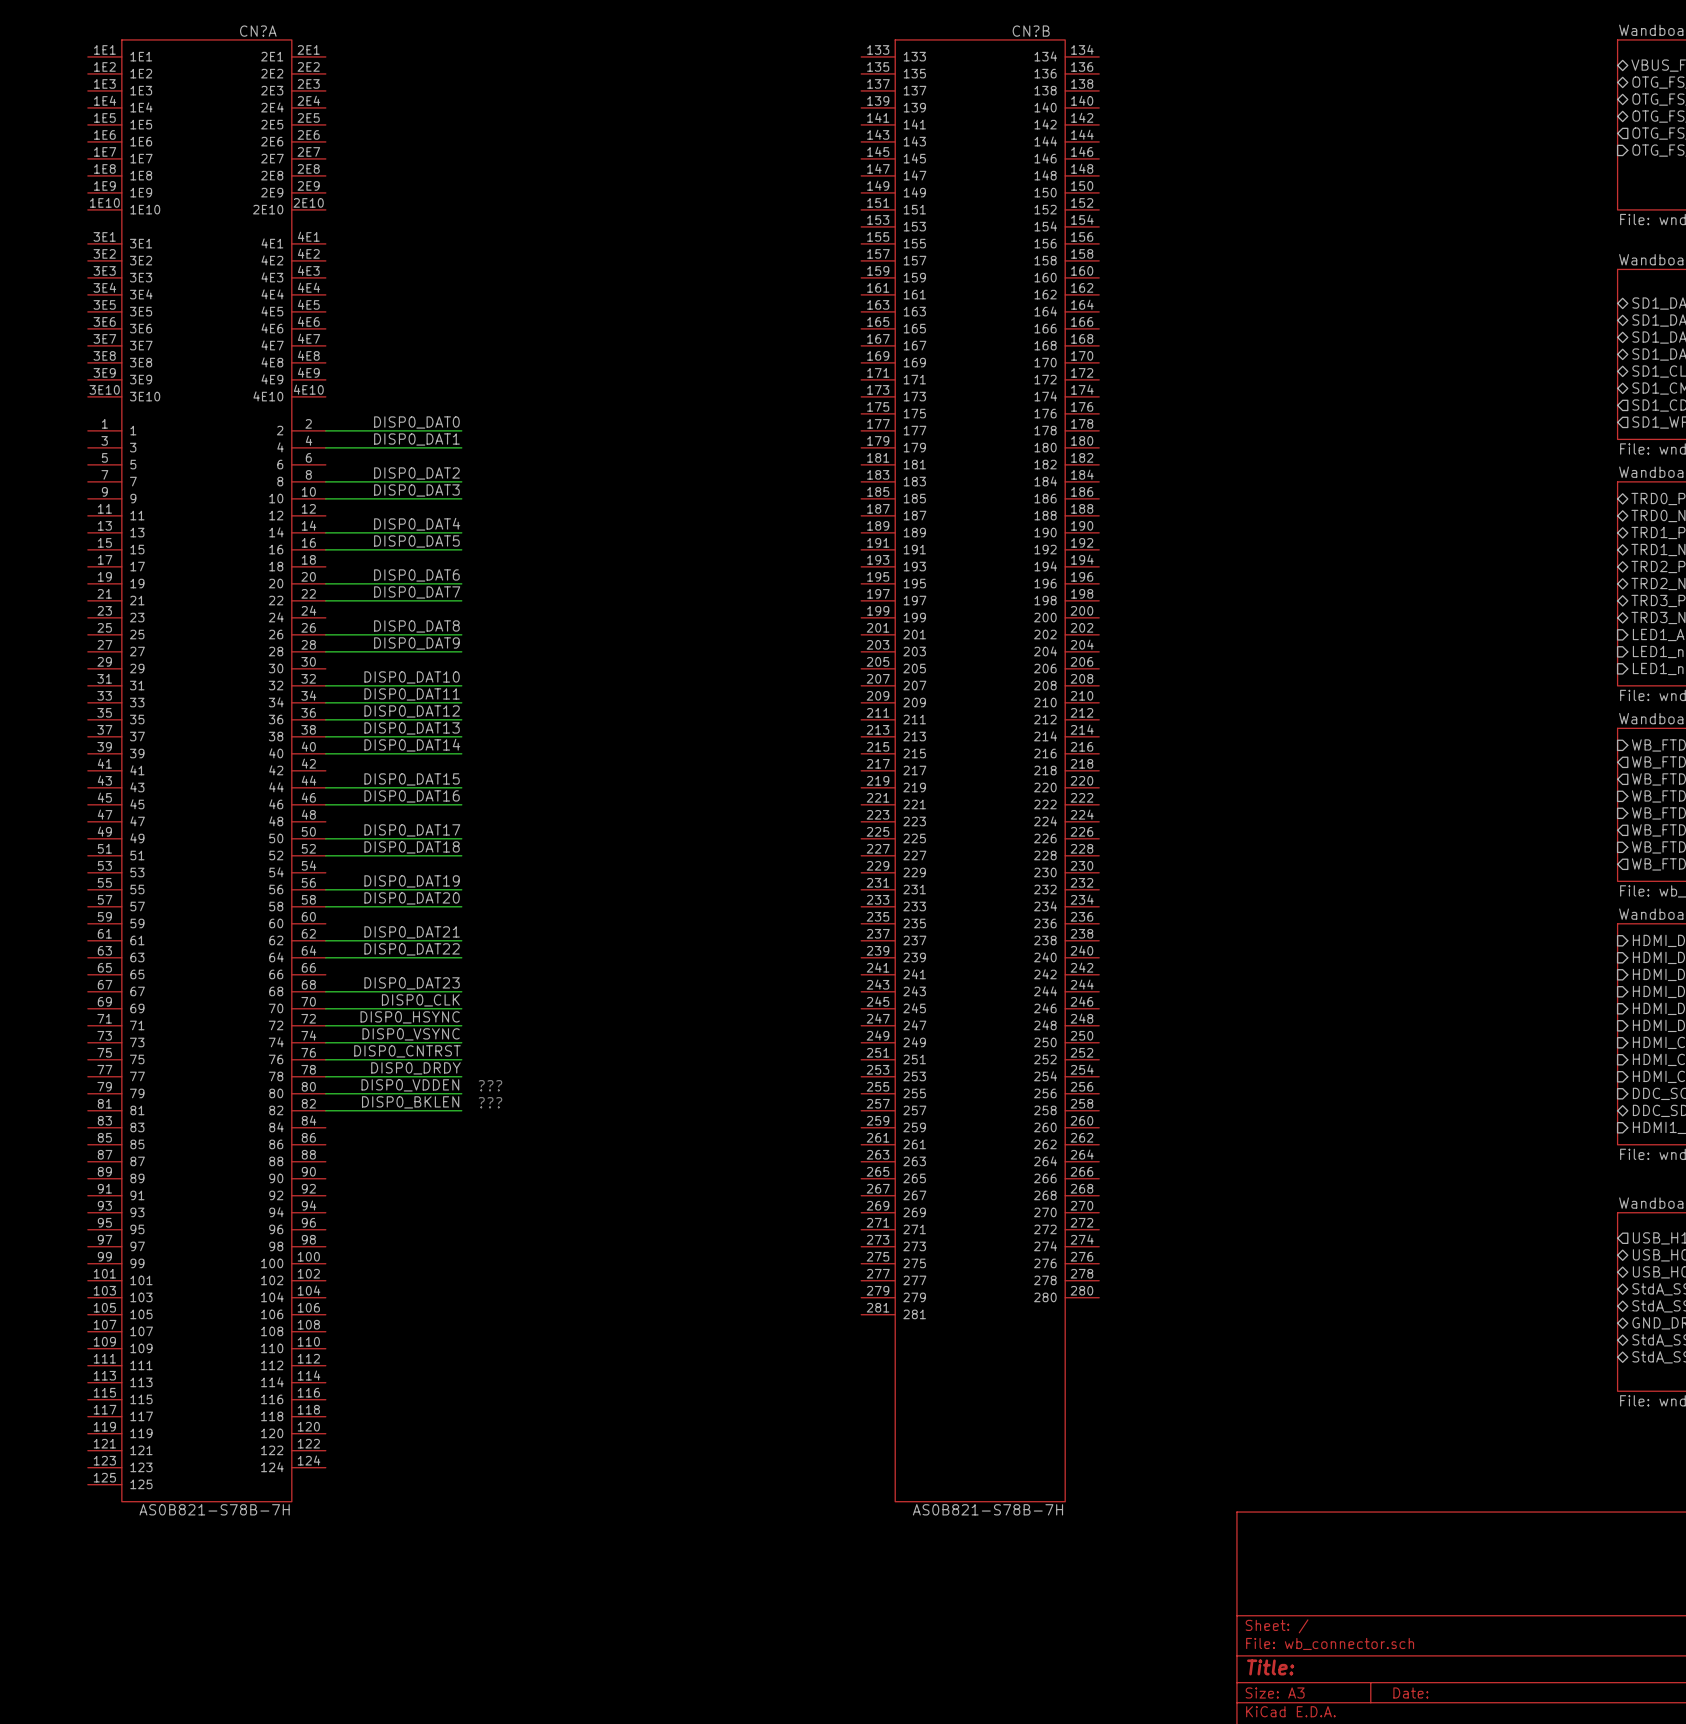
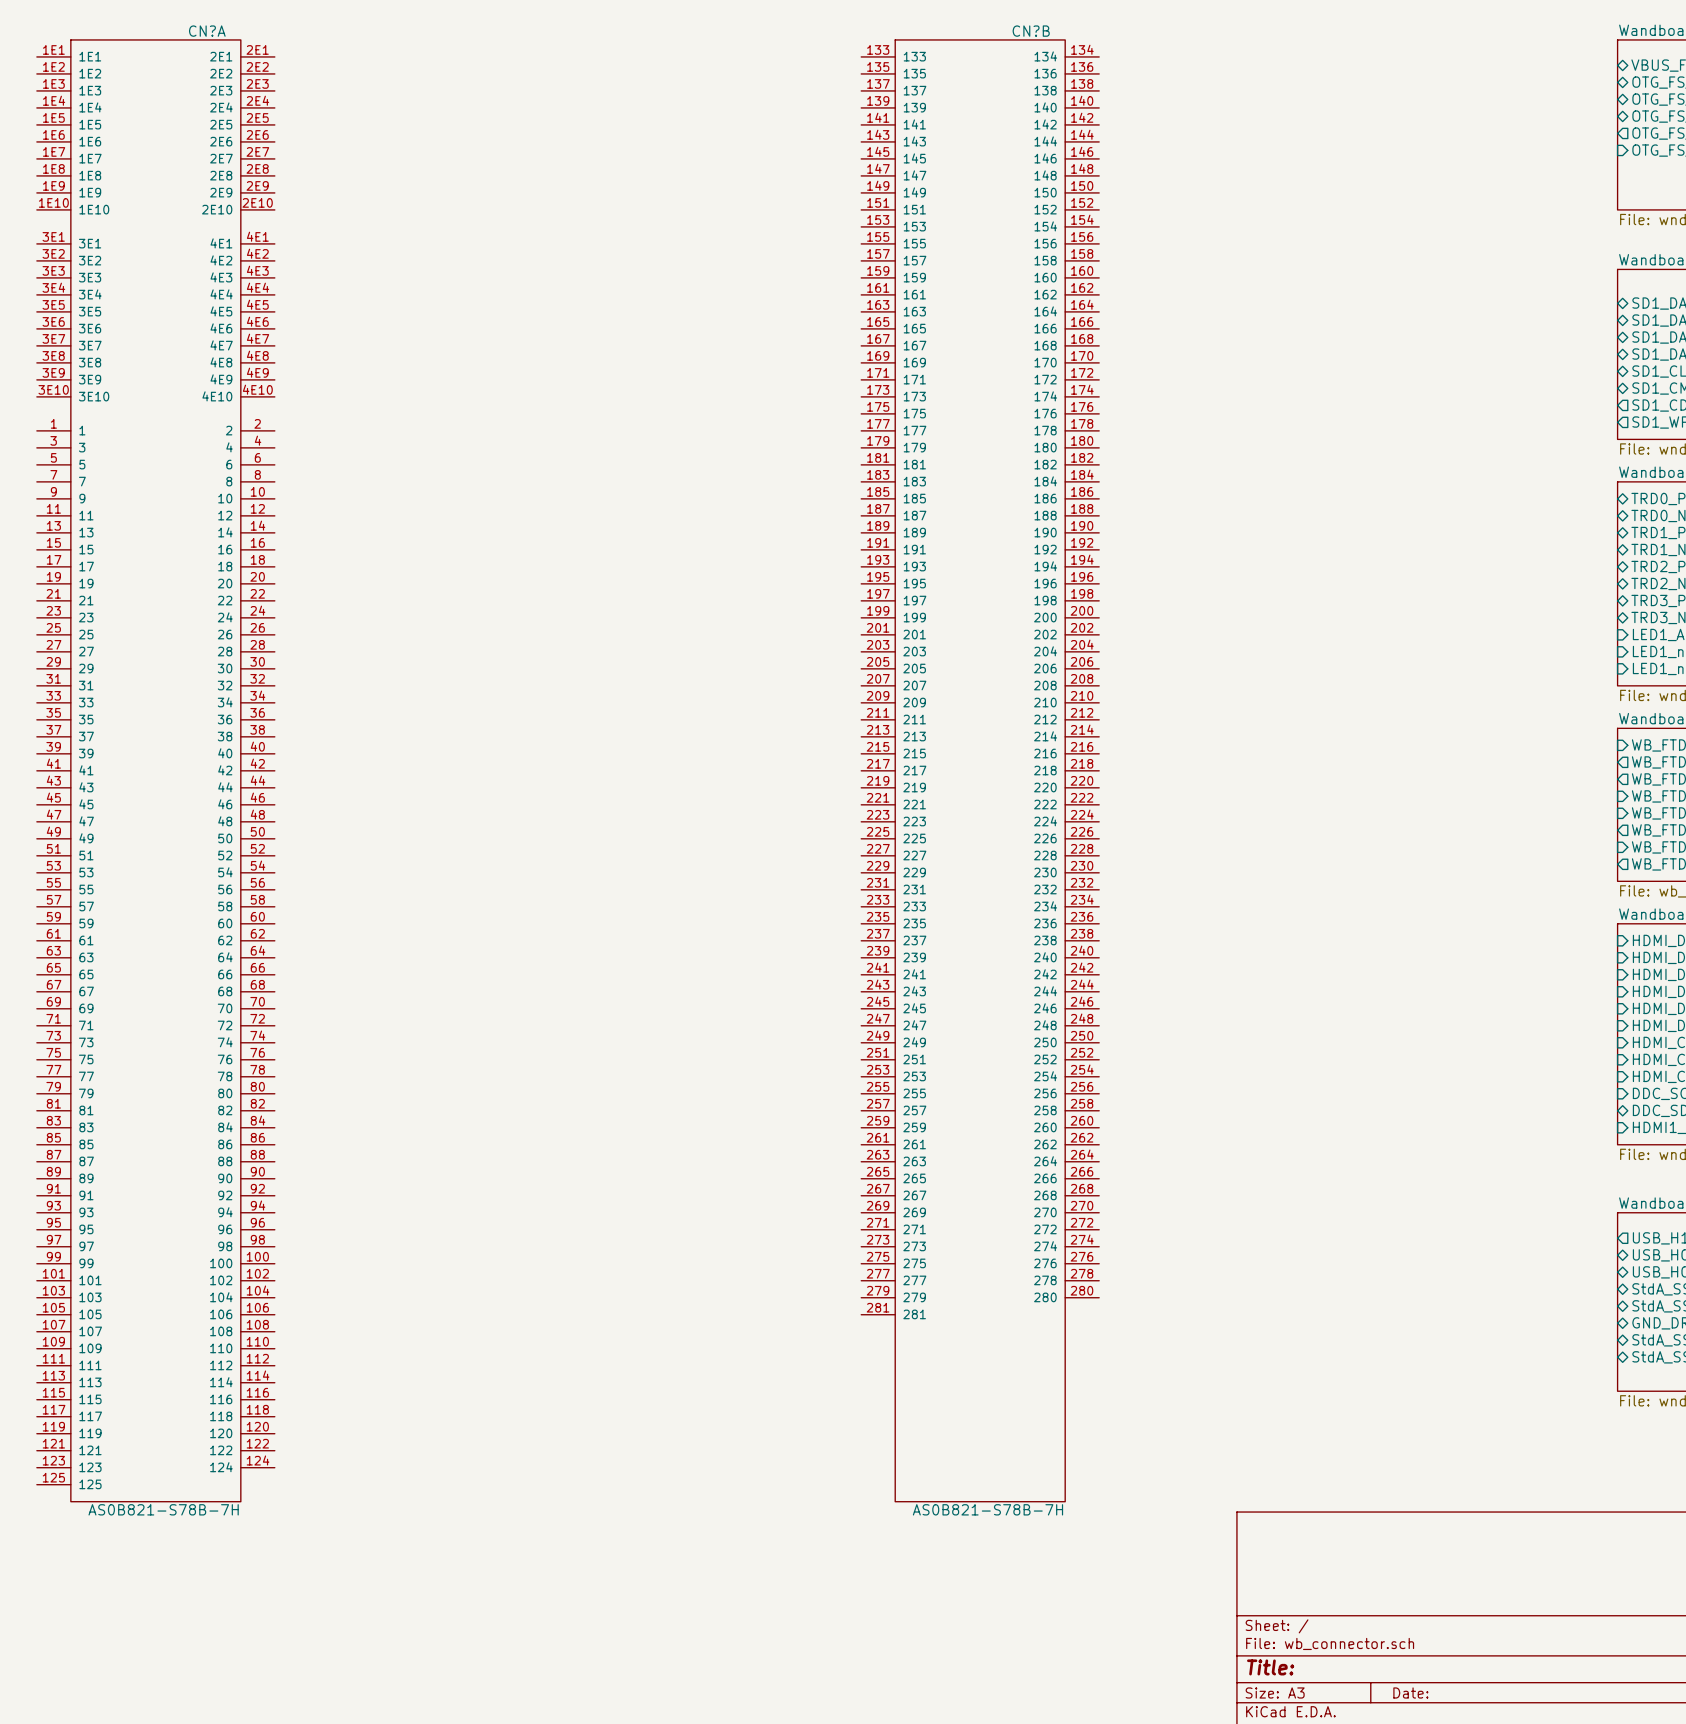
label: DISP0_DAT0 (416, 422) -> none
wire: (325, 430) (461, 430) -> none
label: DISP0_DAT1 (416, 439) -> none
wire: (325, 447) (461, 447) -> none
label: DISP0_DAT2 (416, 473) -> none
wire: (325, 481) (461, 481) -> none
label: DISP0_DAT3 (416, 490) -> none
wire: (325, 498) (461, 498) -> none
label: DISP0_DAT4 (417, 524) -> none
wire: (325, 532) (461, 532) -> none
label: DISP0_DAT5 (416, 541) -> none
wire: (325, 549) (461, 549) -> none
label: DISP0_DAT6 (416, 575) -> none
wire: (325, 583) (461, 583) -> none
label: DISP0_DAT7 (417, 592) -> none
wire: (325, 600) (461, 600) -> none
label: DISP0_DAT8 (416, 626) -> none
wire: (325, 634) (461, 634) -> none
label: DISP0_DAT9 (416, 643) -> none
wire: (325, 651) (461, 651) -> none
label: DISP0_DAT10 (412, 677) -> none
wire: (325, 685) (461, 685) -> none
label: DISP0_DAT11 (412, 694) -> none
wire: (325, 702) (461, 702) -> none
label: DISP0_DAT12 (412, 711) -> none
wire: (325, 719) (461, 719) -> none
label: DISP0_DAT13 (412, 728) -> none
wire: (325, 736) (461, 736) -> none
label: DISP0_DAT14 (412, 745) -> none
wire: (325, 753) (461, 753) -> none
CN?A position: (206, 770) -> (155, 770)
label: DISP0_DAT15 (412, 779) -> none
wire: (325, 787) (461, 787) -> none
label: DISP0_DAT16 (412, 796) -> none
wire: (325, 804) (461, 804) -> none
label: DISP0_DAT17 (412, 830) -> none
wire: (325, 838) (461, 838) -> none
label: DISP0_DAT18 (412, 847) -> none
wire: (325, 855) (461, 855) -> none
label: DISP0_DAT19 (412, 881) -> none
wire: (325, 889) (461, 889) -> none
label: DISP0_DAT20 (412, 898) -> none
wire: (325, 906) (461, 906) -> none
label: DISP0_DAT21 (412, 932) -> none
wire: (325, 940) (461, 940) -> none
label: DISP0_DAT22 (412, 949) -> none
wire: (325, 957) (461, 957) -> none
label: DISP0_DAT23 (412, 983) -> none
wire: (325, 991) (461, 991) -> none
label: DISP0_CLK (420, 1000) -> none
wire: (325, 1008) (461, 1008) -> none
label: DISP0_HSYNC (410, 1017) -> none
wire: (325, 1025) (461, 1025) -> none
label: DISP0_VSYNC (411, 1034) -> none
wire: (325, 1042) (461, 1042) -> none
label: DISP0_CNTRST (407, 1051) -> none
wire: (325, 1059) (461, 1059) -> none
label: DISP0_DRDY (415, 1068) -> none
wire: (325, 1076) (461, 1076) -> none
label: DISP0_VDDEN (410, 1085) -> none
text: ??? (490, 1085) -> none
wire: (325, 1093) (461, 1093) -> none
label: DISP0_BKLEN (410, 1102) -> none
text: ??? (490, 1102) -> none
wire: (325, 1110) (461, 1110) -> none

